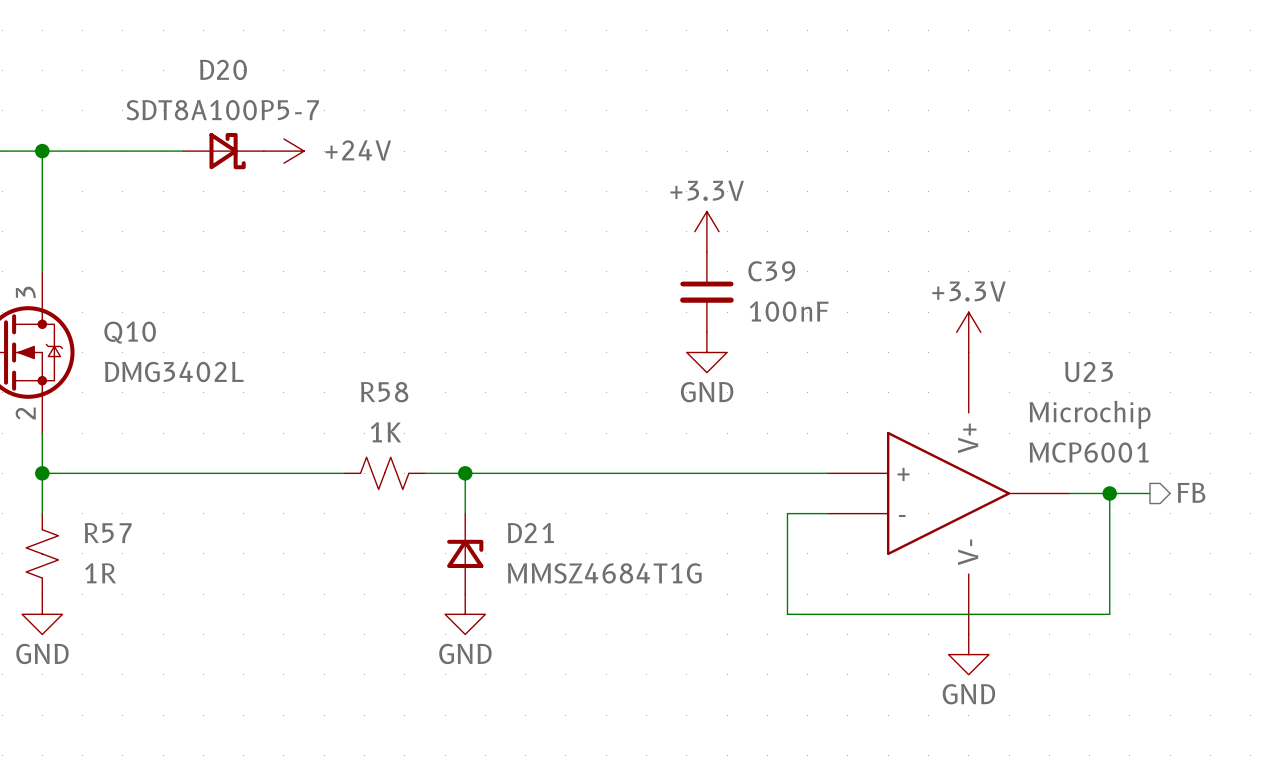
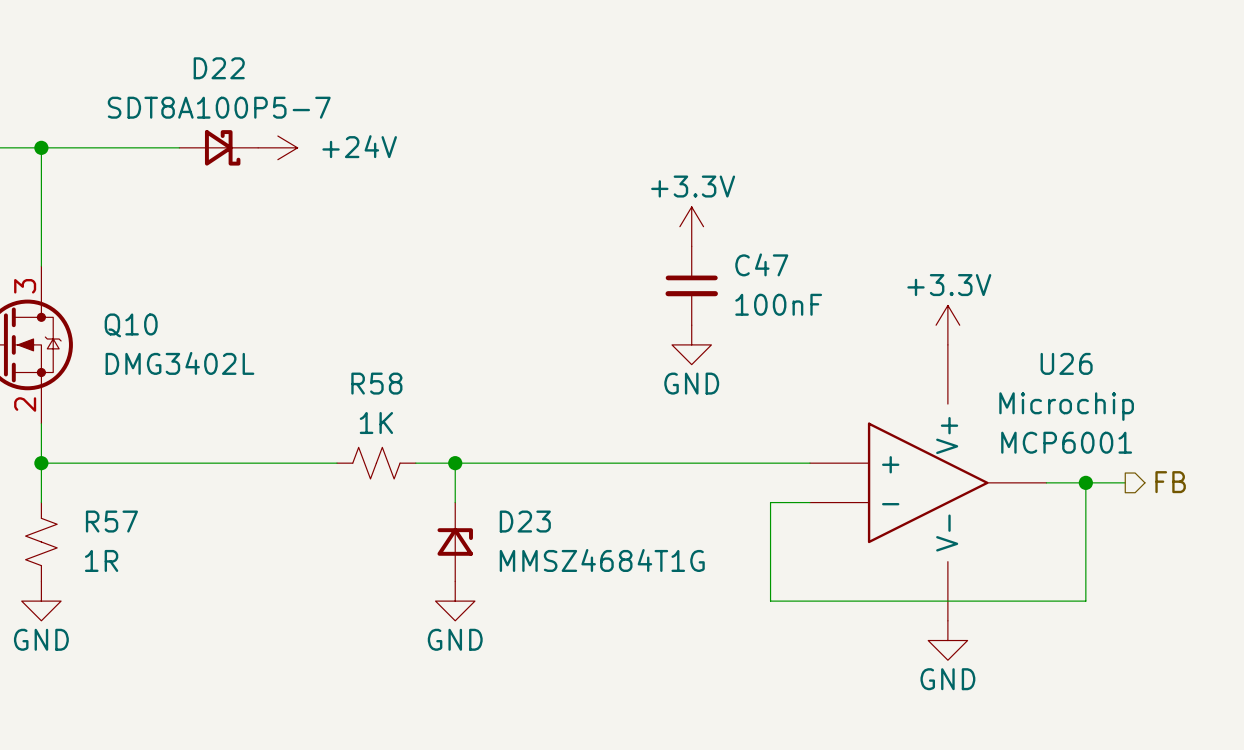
D20 name: D20 (223, 69) -> D22 (219, 68)
C39 name: C39 (771, 271) -> C47 (761, 264)
U23 name: U23 (1088, 372) -> U26 (1066, 363)
D21 name: D21 (530, 533) -> D23 (525, 521)

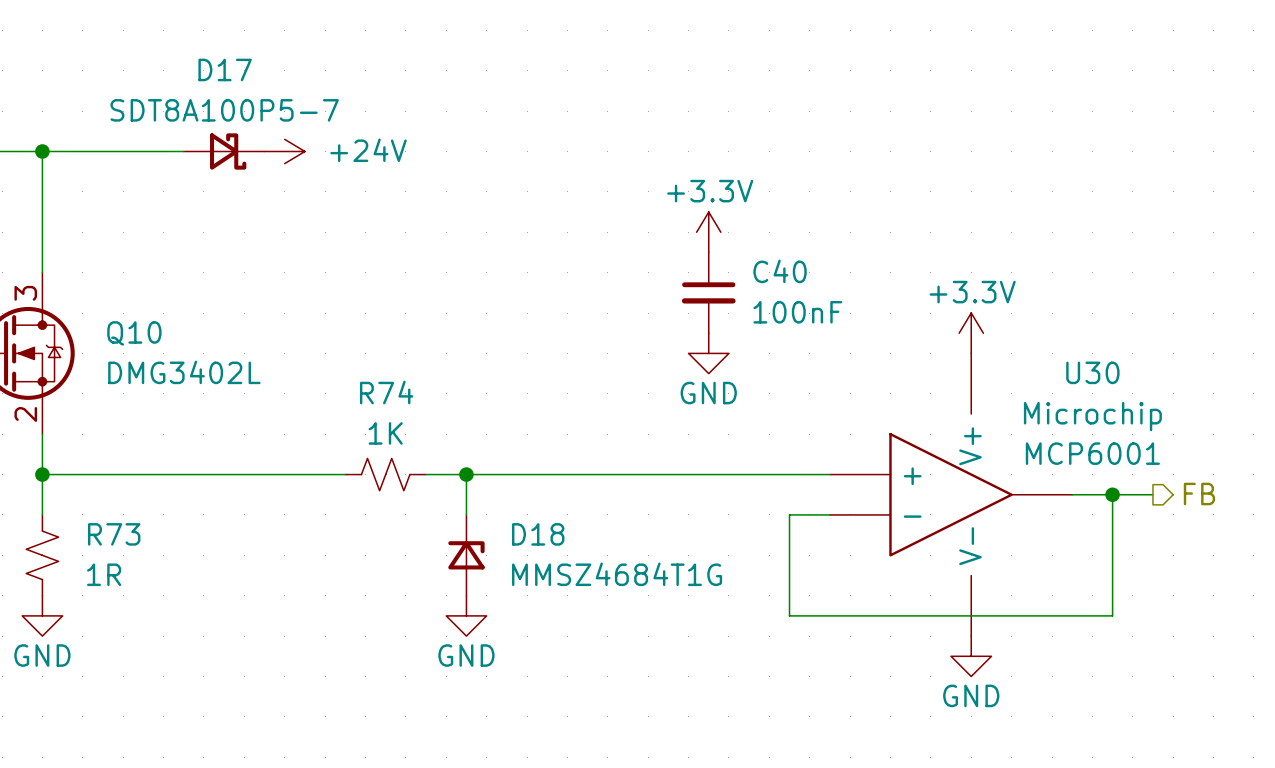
D22 name: D22 (219, 68) -> D17 (225, 69)
C47 name: C47 (761, 264) -> C40 (780, 271)
U26 name: U26 (1066, 363) -> U30 (1092, 372)
R58 name: R58 (376, 383) -> R74 (386, 392)
R57 name: R57 (111, 521) -> R73 (114, 534)
D23 name: D23 (525, 521) -> D18 (538, 534)

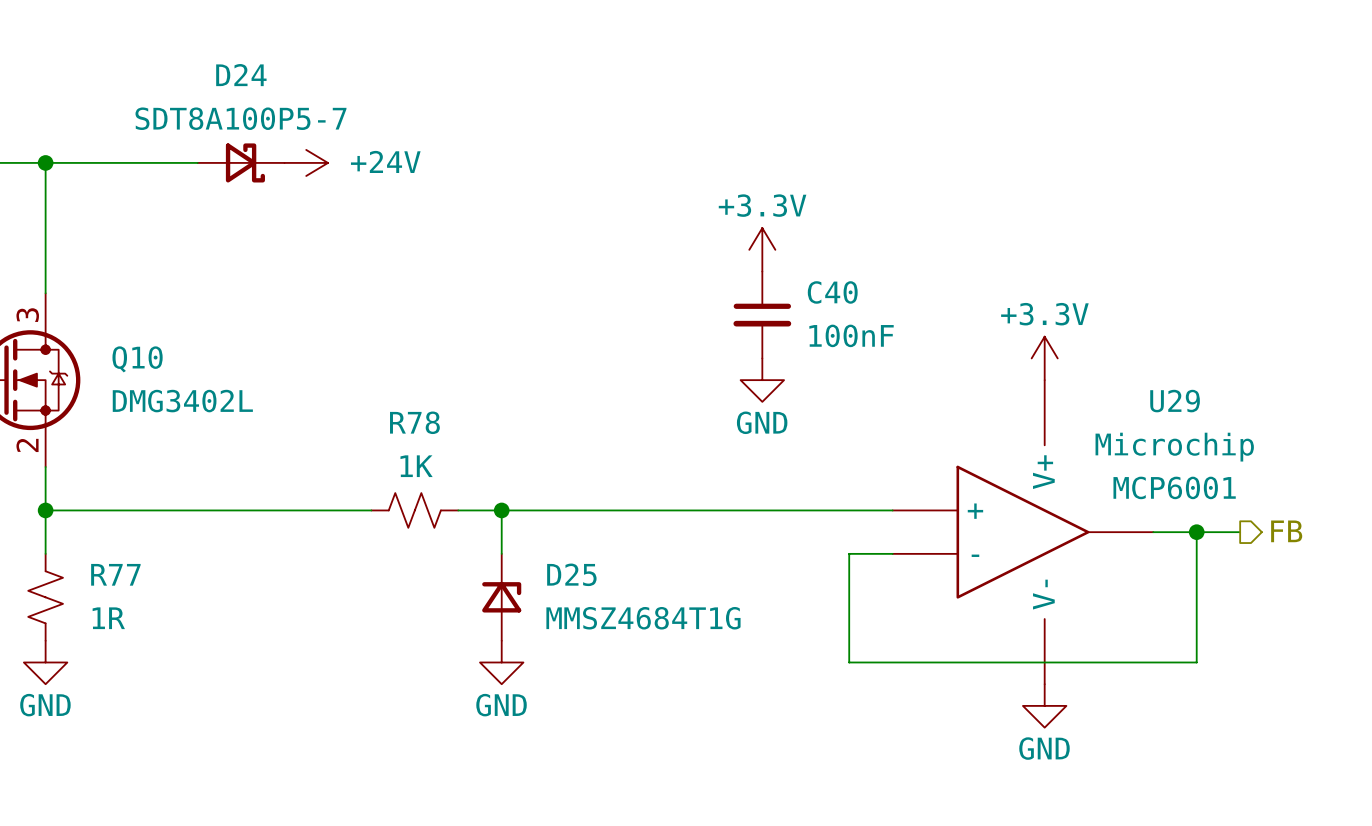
D17 name: D17 (225, 69) -> D24 (241, 75)
U30 name: U30 (1092, 372) -> U29 (1175, 401)
R74 name: R74 (386, 392) -> R78 (414, 422)
R73 name: R73 (114, 534) -> R77 (115, 574)
D18 name: D18 (538, 534) -> D25 (571, 574)

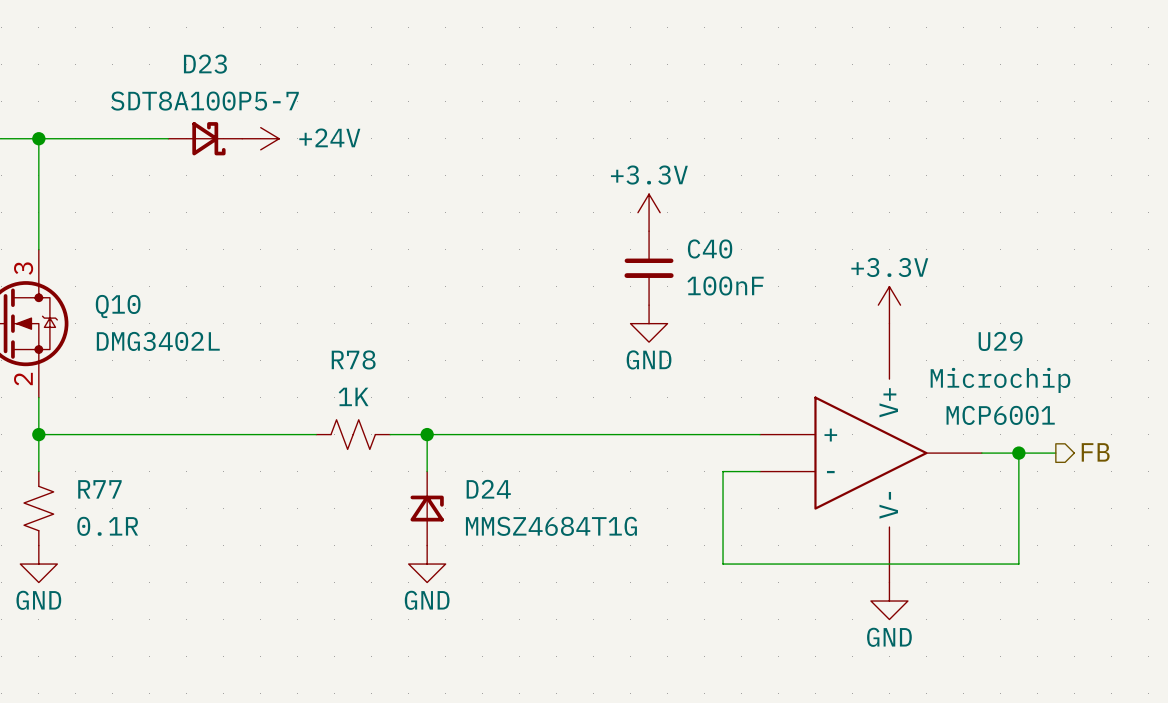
D24 name: D24 (241, 75) -> D23 (205, 64)
D25 name: D25 (571, 574) -> D24 (488, 489)
R77 value: 1R (108, 618) -> 0.1R (107, 526)

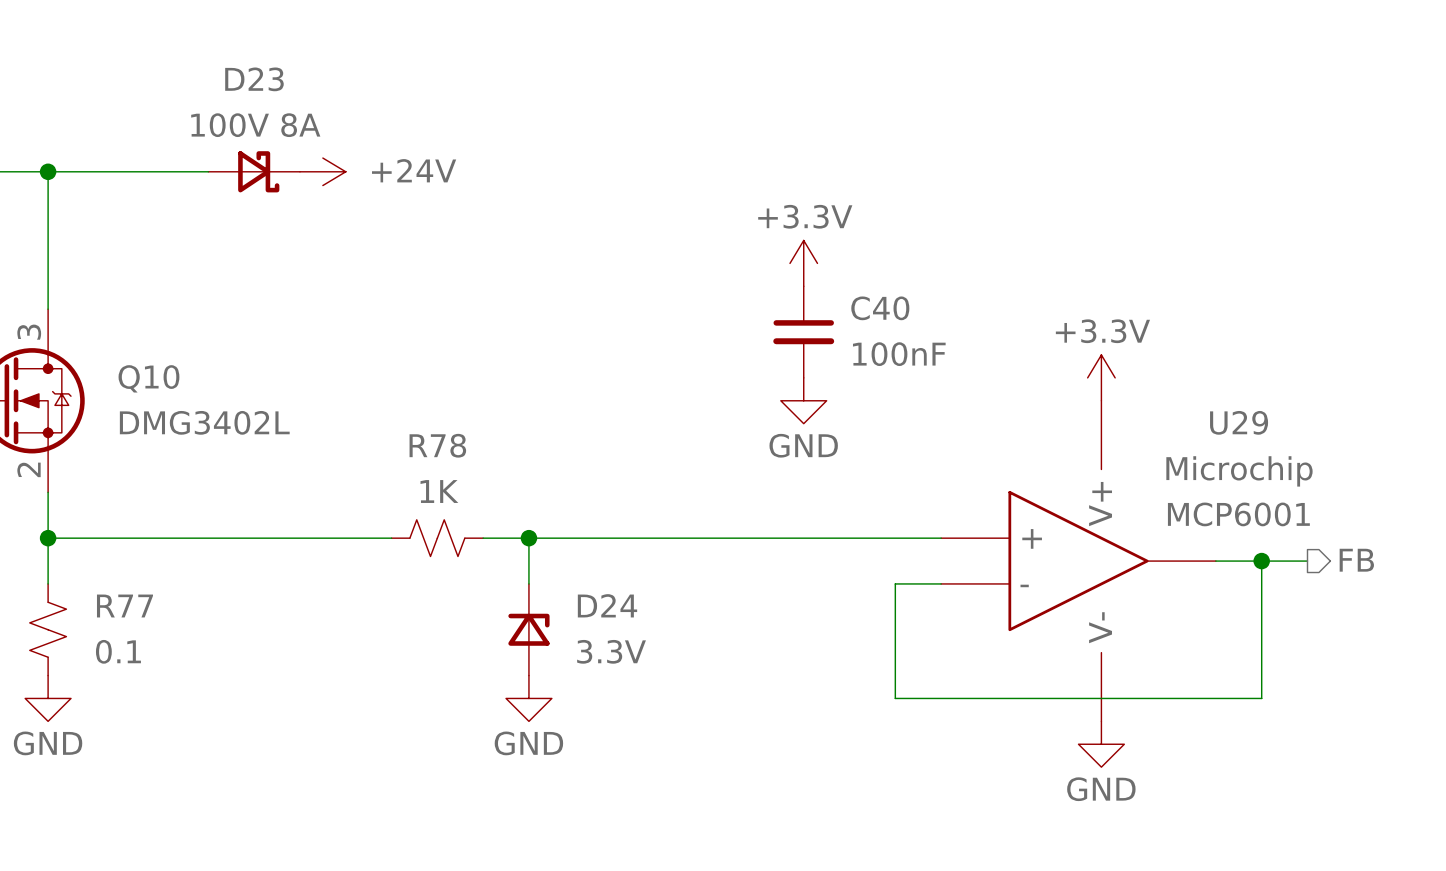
D23 value: SDT8A100P5-7 (204, 101) -> 100V 8A (255, 125)
R77 value: 0.1R (107, 526) -> 0.1 (118, 651)
D24 value: MMSZ4684T1G (551, 526) -> 3.3V (611, 651)

